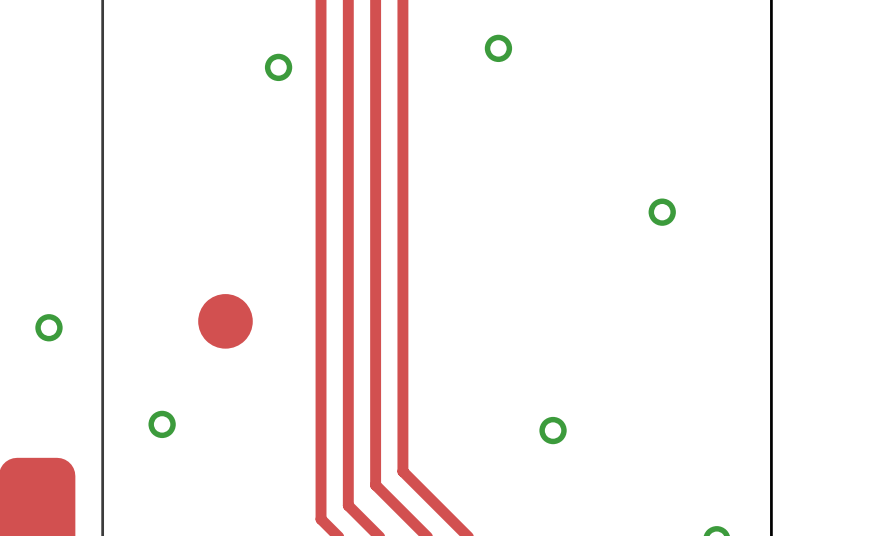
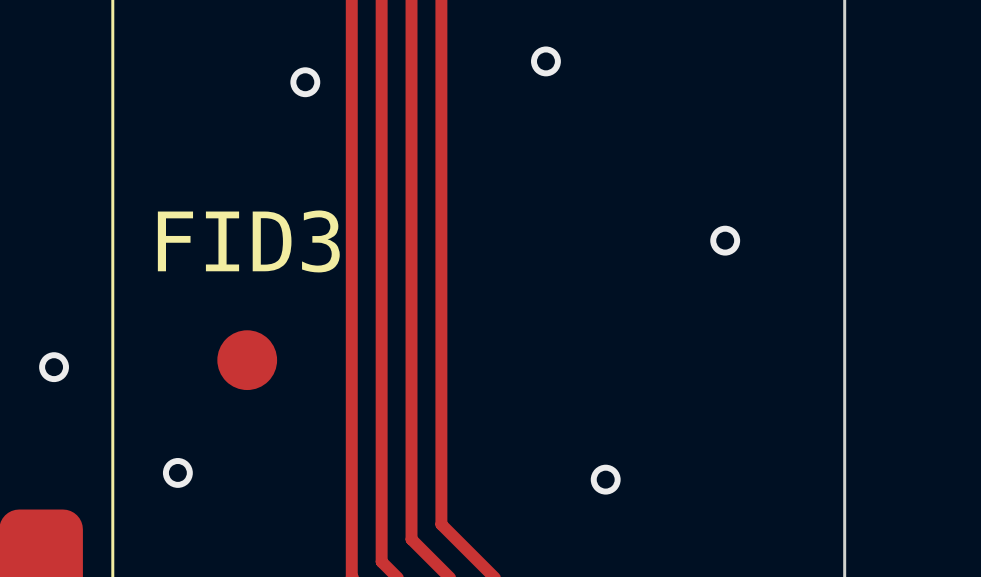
FID3 name: none -> FID3 (248, 241)

